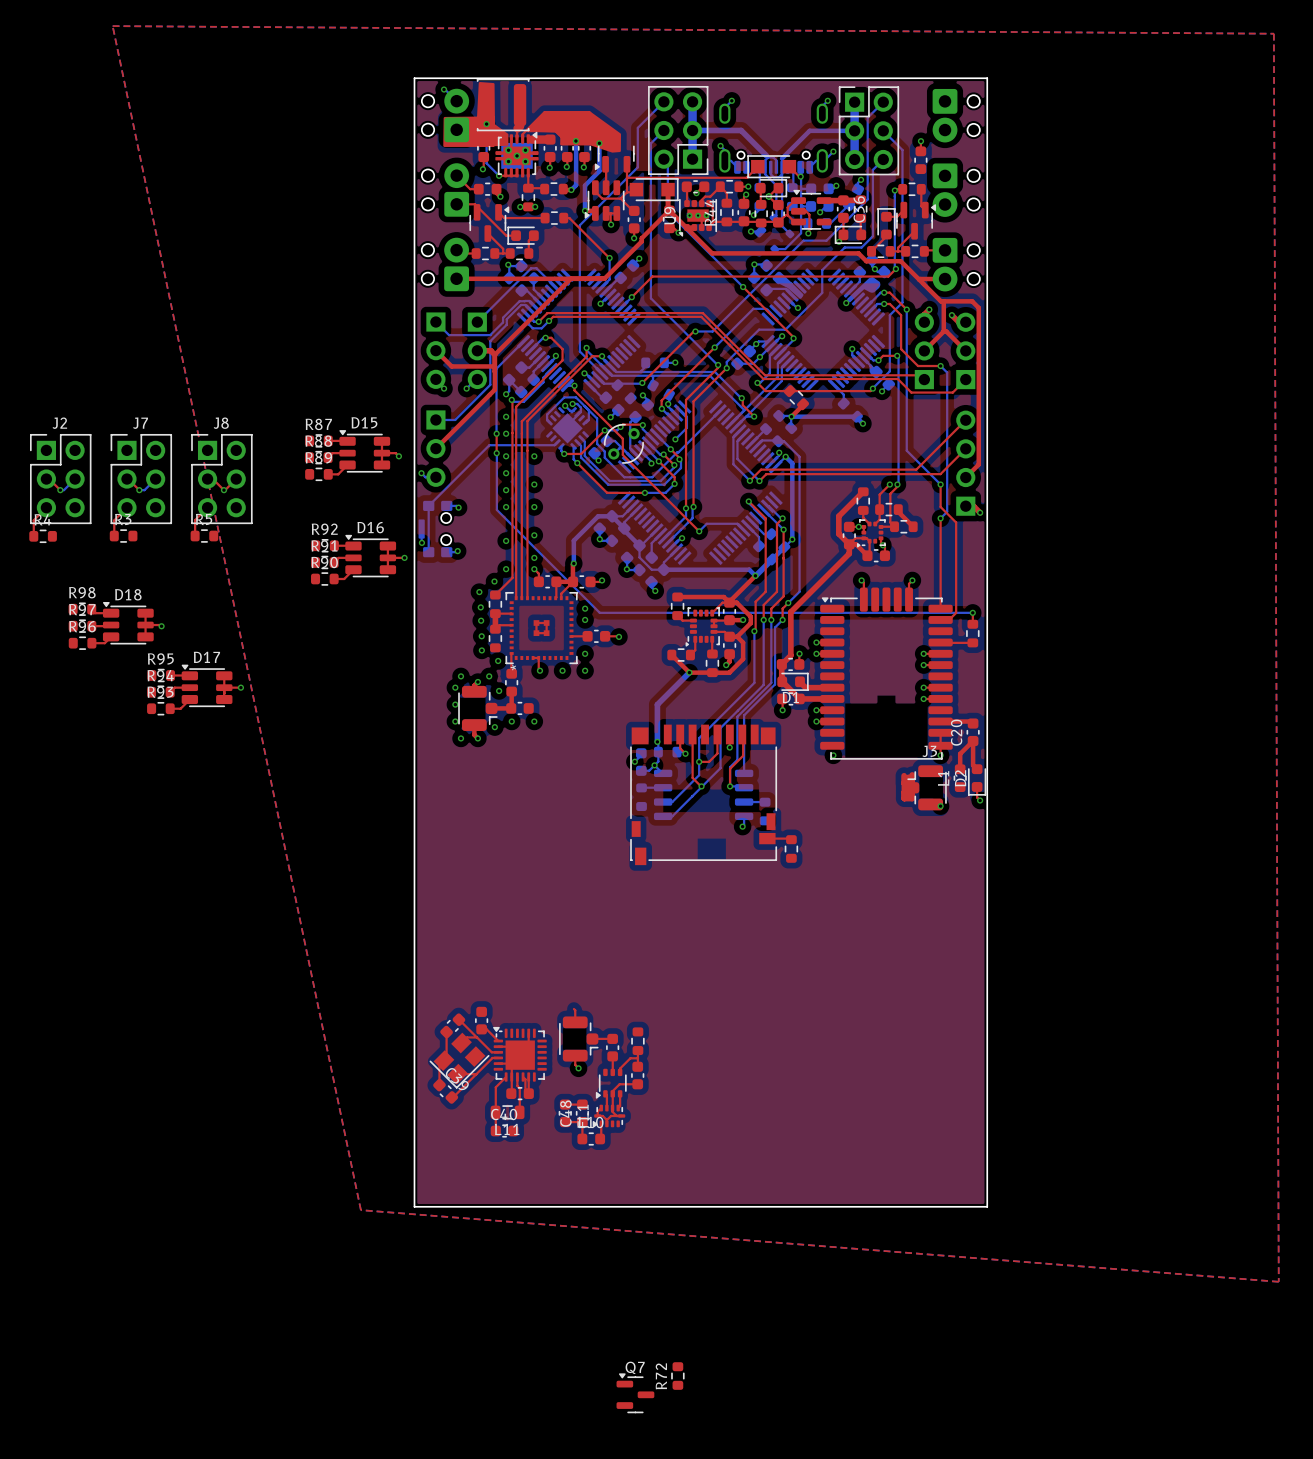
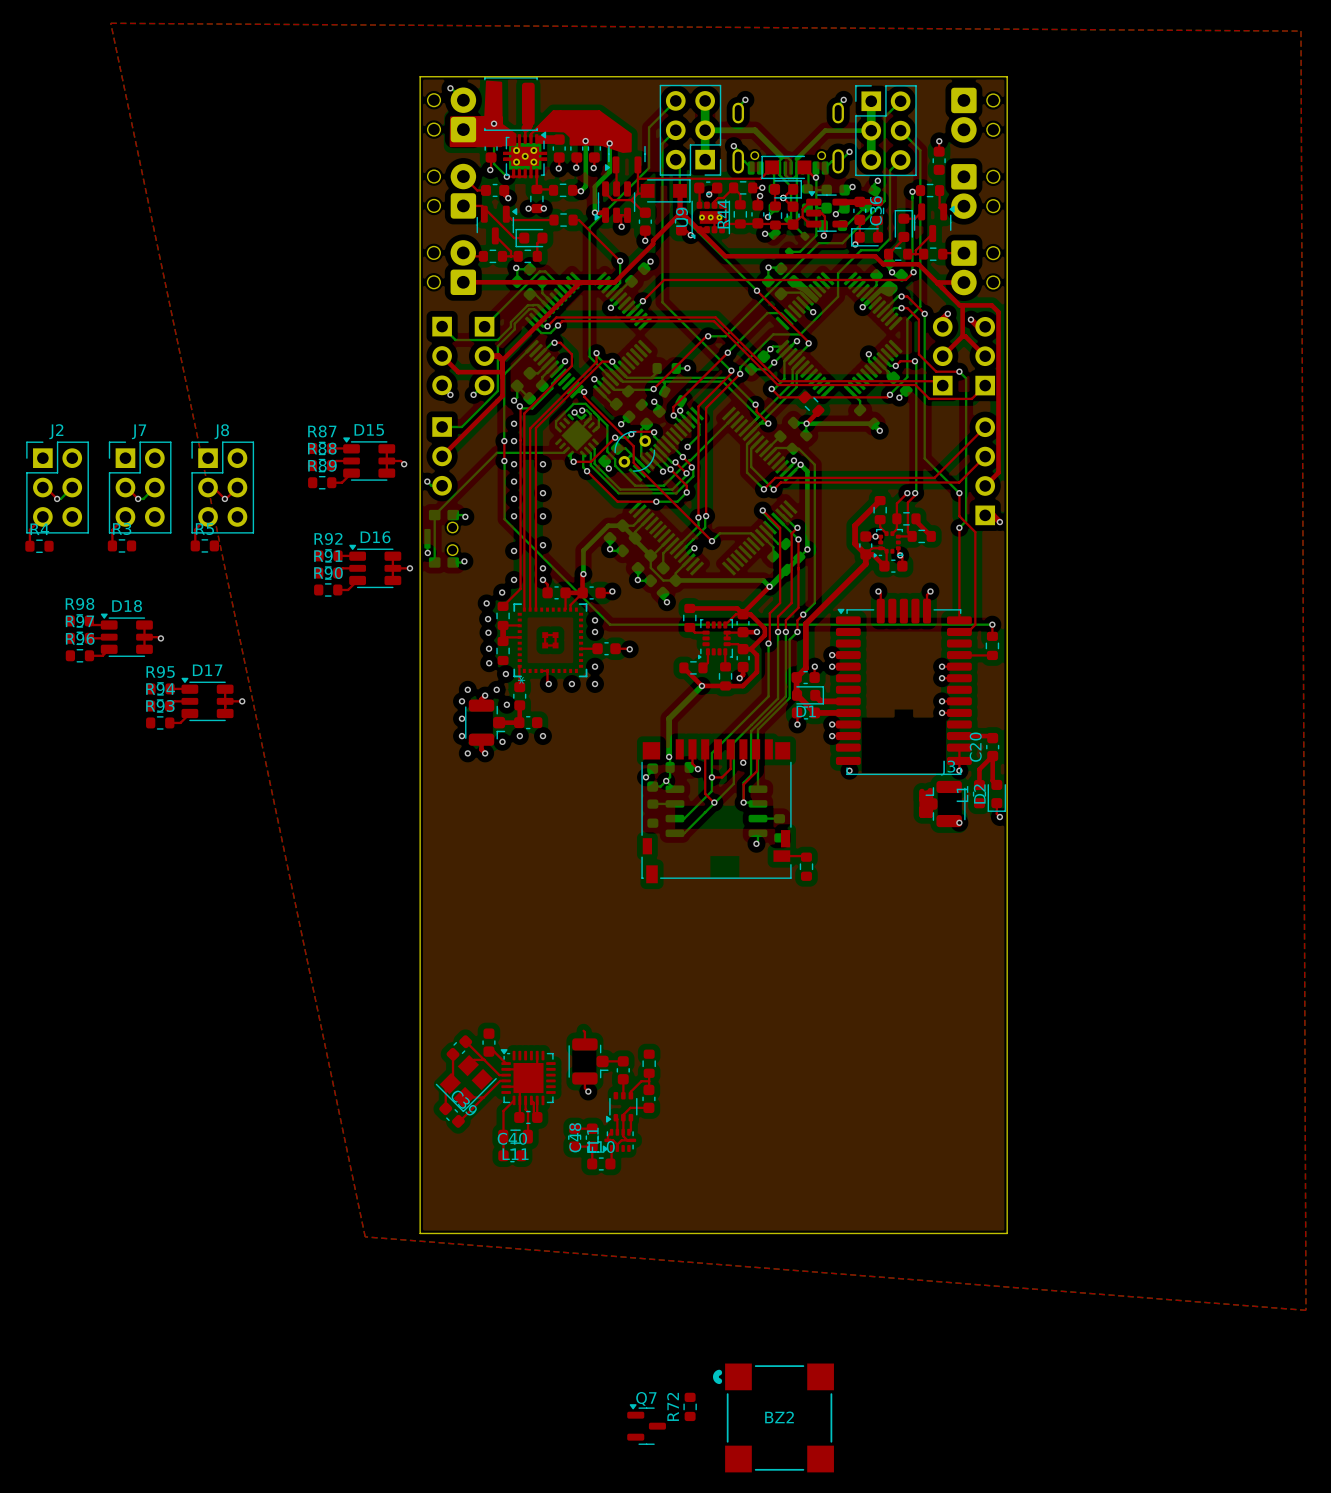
BZ2: none -> (773, 1417)

